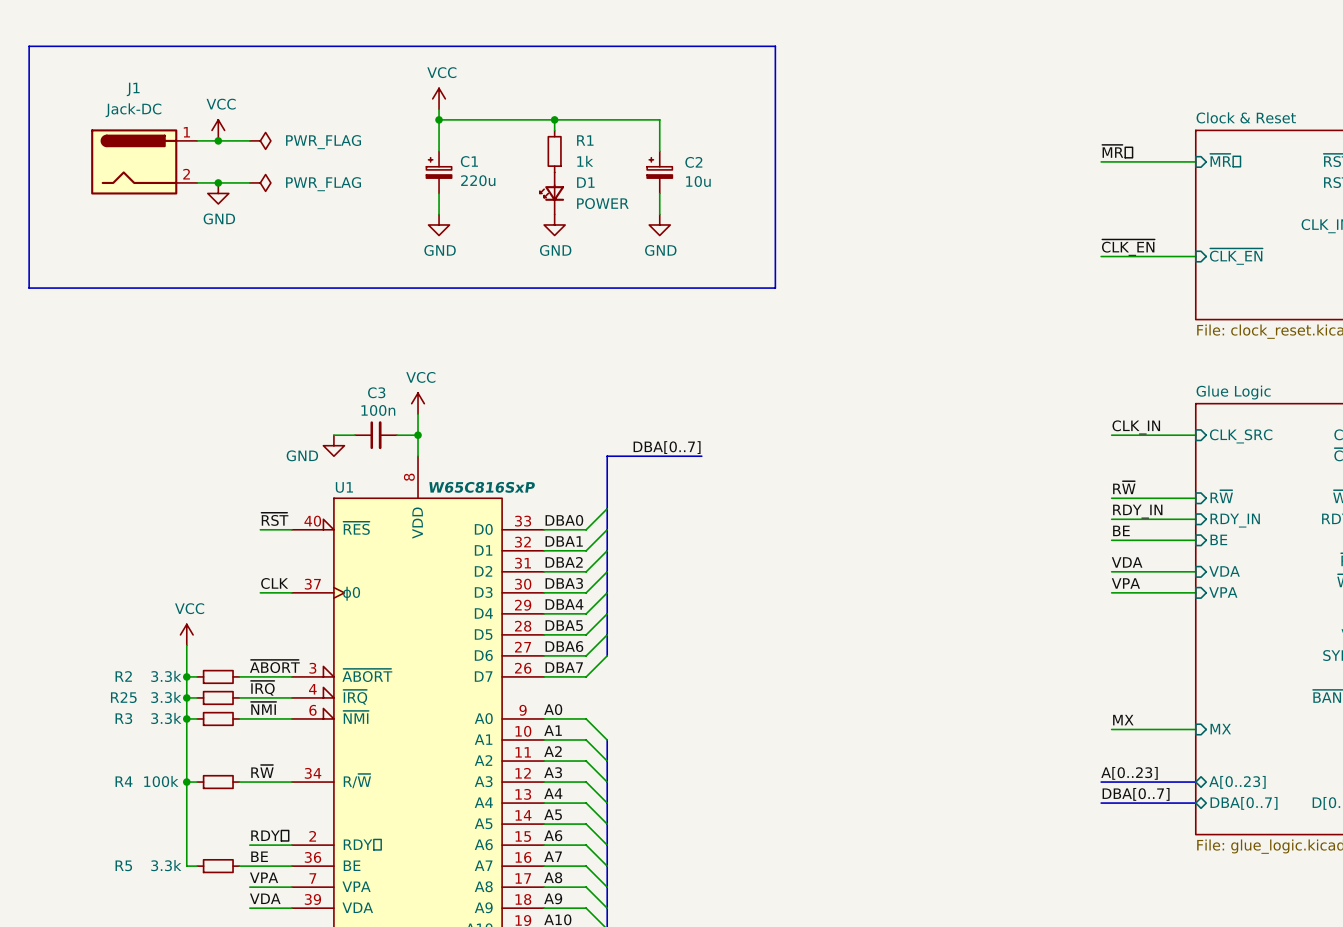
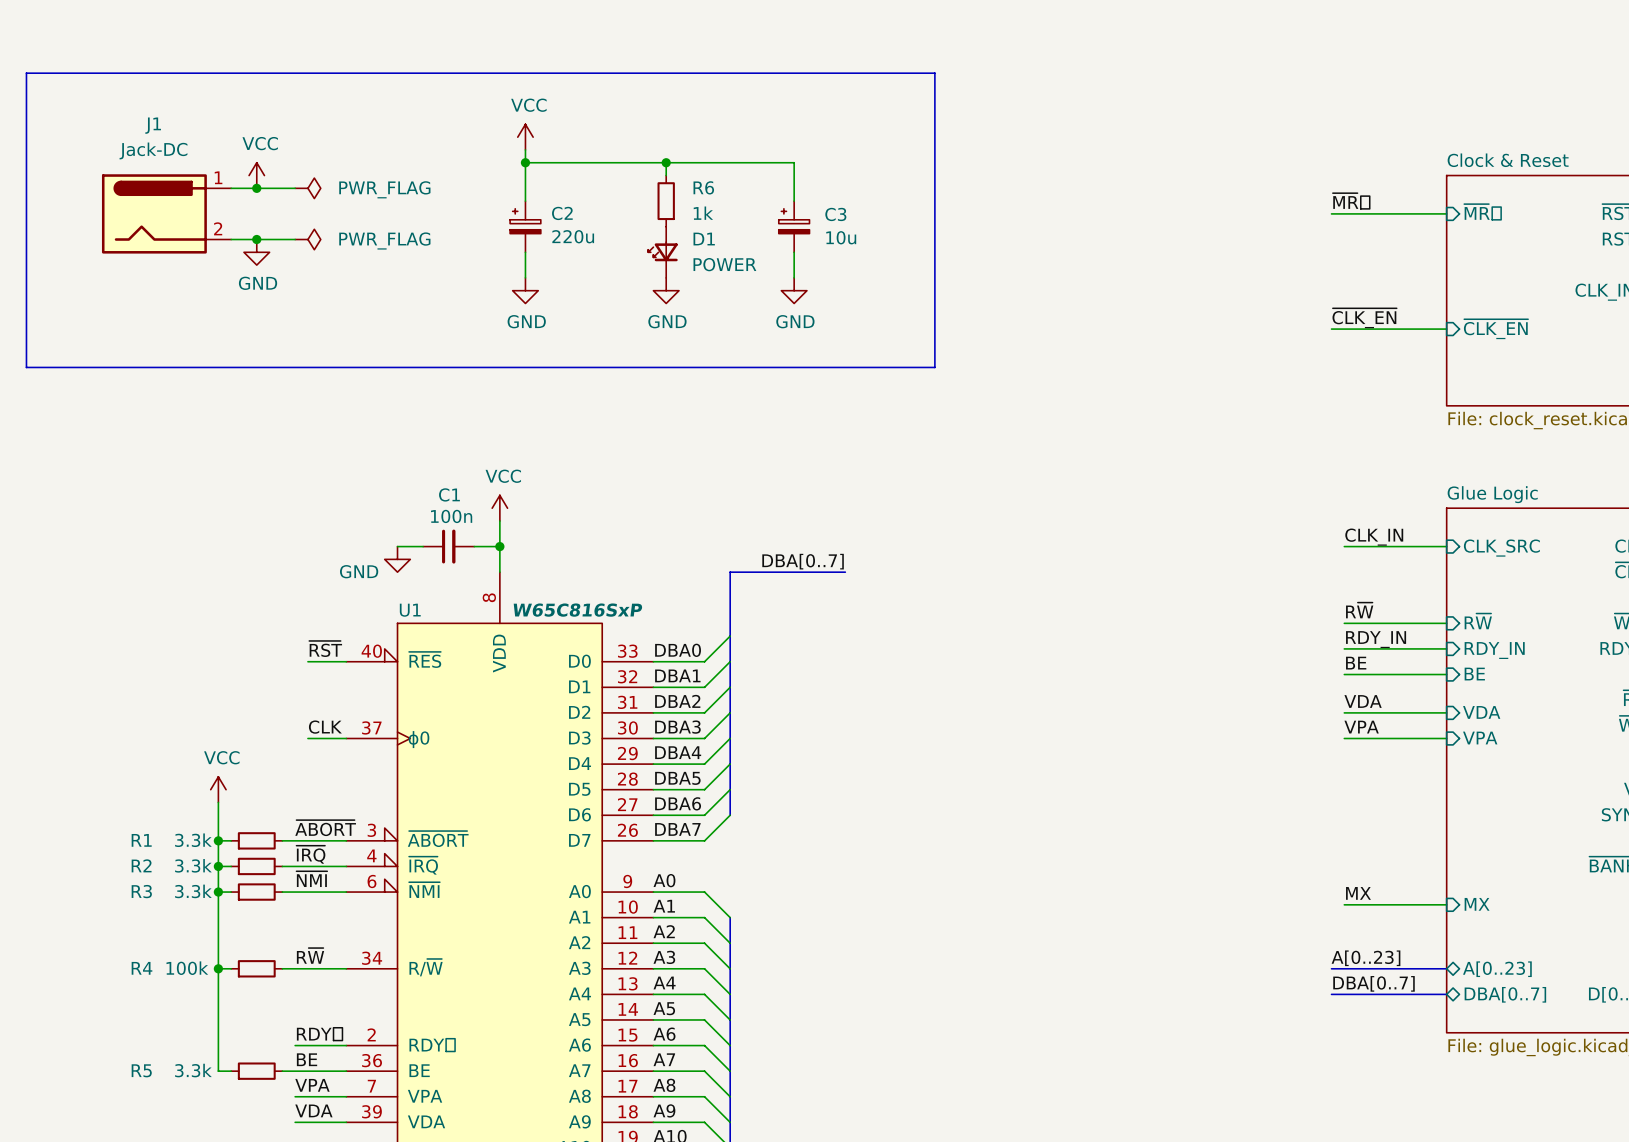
R1 name: R1 (585, 140) -> R6 (703, 187)
C1 name: C1 (469, 161) -> C2 (562, 213)
C2 name: C2 (693, 162) -> C3 (835, 214)
C3 name: C3 (376, 392) -> C1 (449, 494)
R2 name: R2 (123, 676) -> R1 (141, 840)
R25 name: R25 (123, 697) -> R2 (141, 865)

